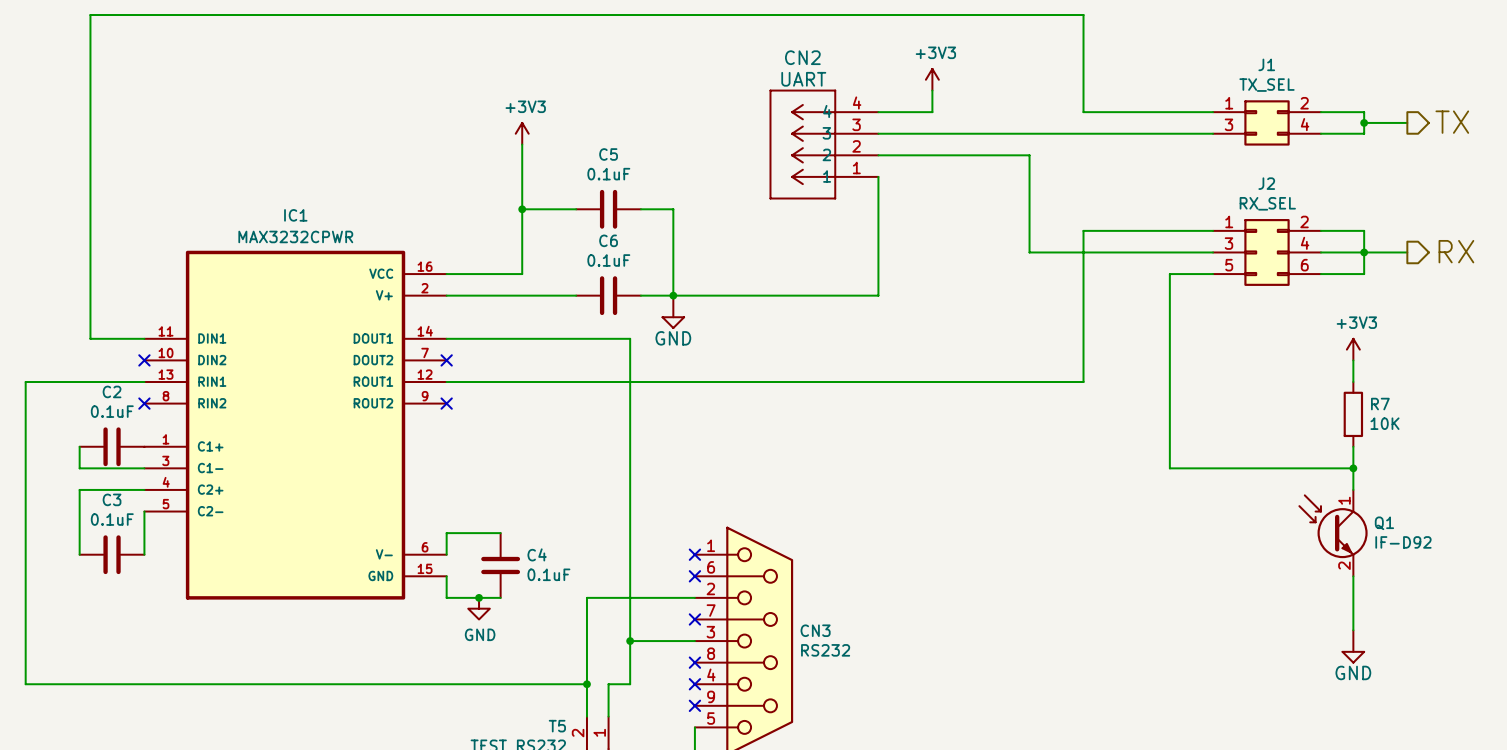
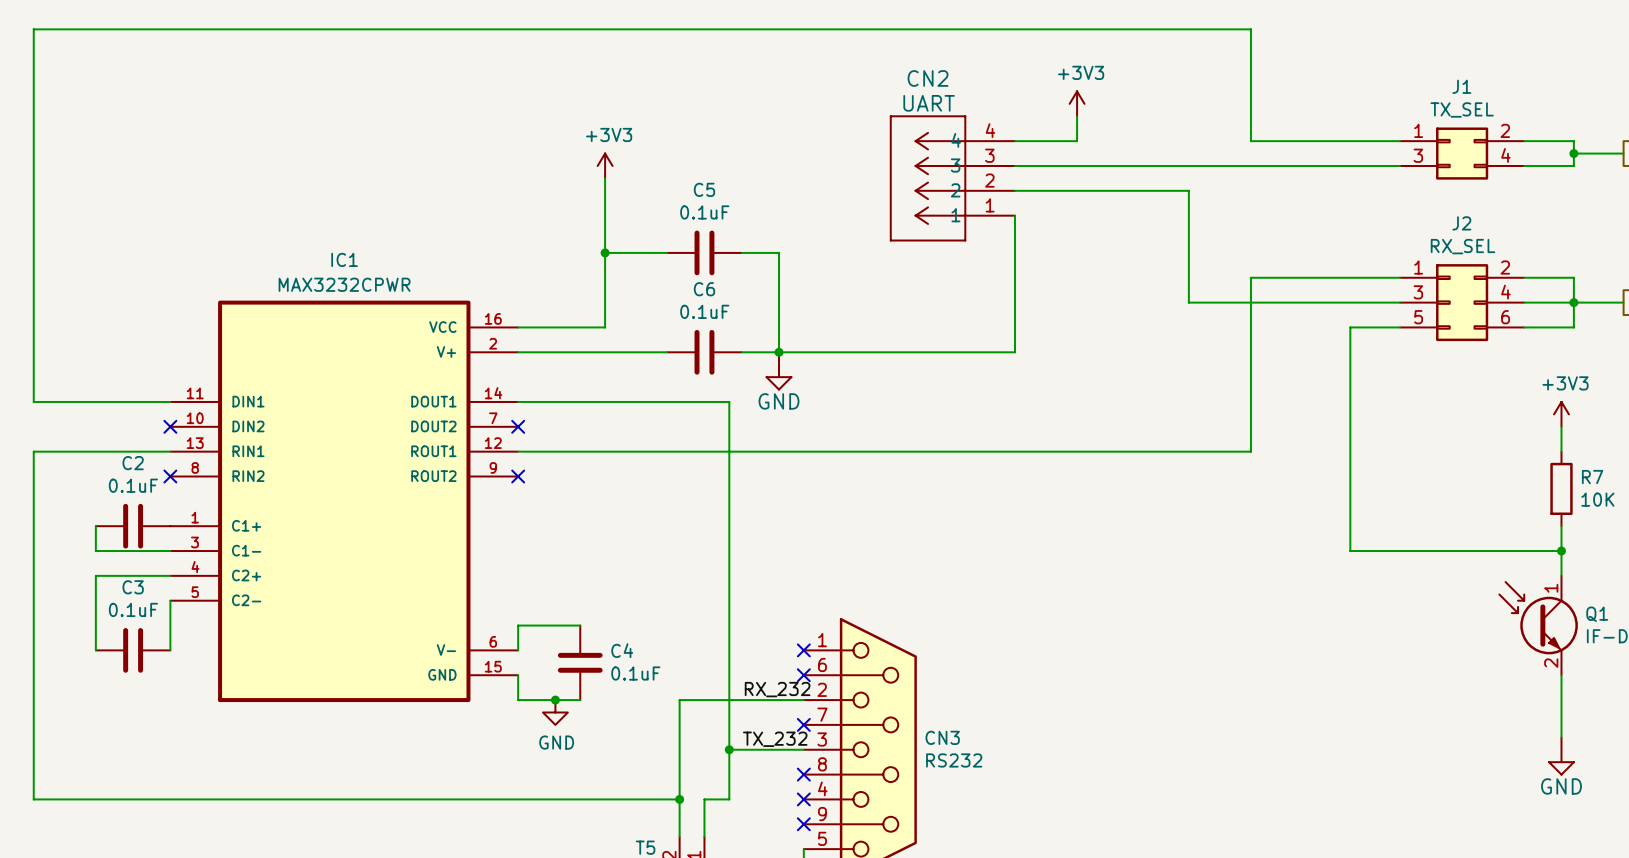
wire: (90, 15) (90, 338) -> (108, 29) (33, 29) (33, 401) (108, 401)
label: none -> RX_232 (777, 689)
label: none -> TX_232 (775, 739)

